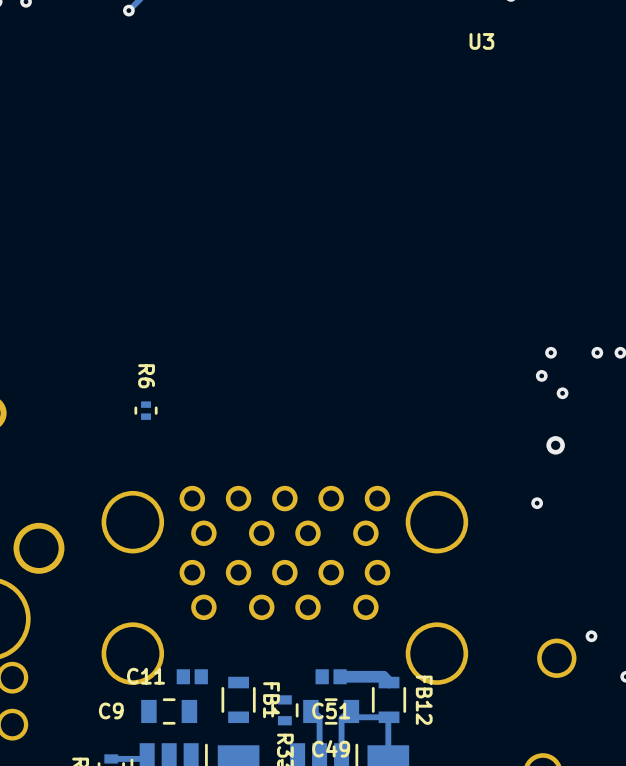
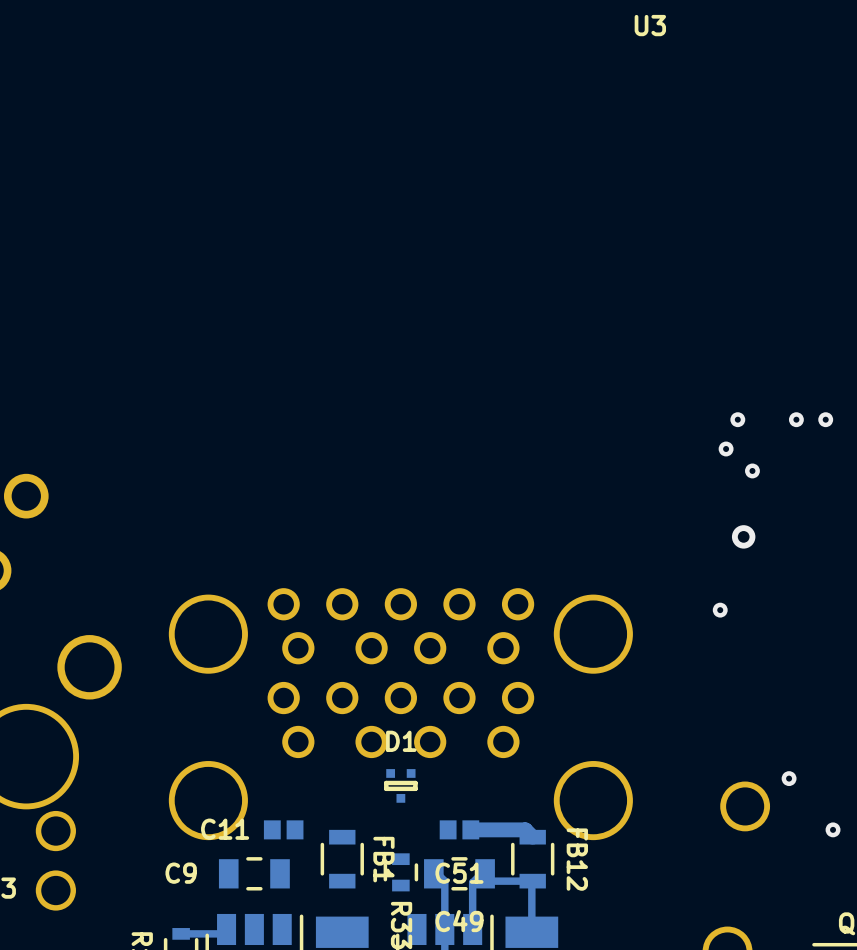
R6: (146, 410) -> none
D1: none -> (400, 785)

